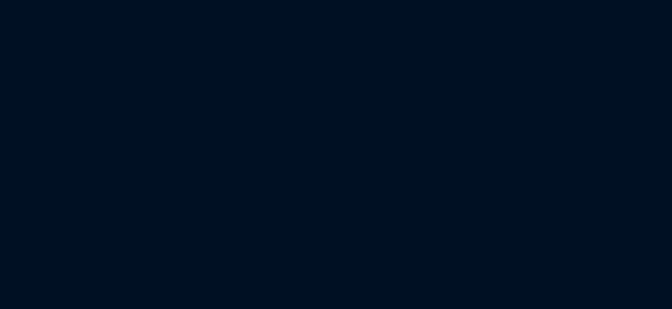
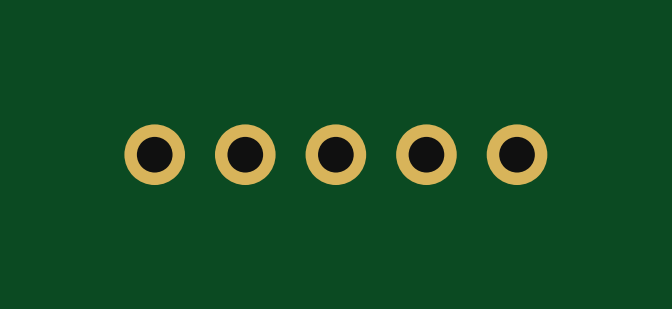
part: none -> (335, 154)

